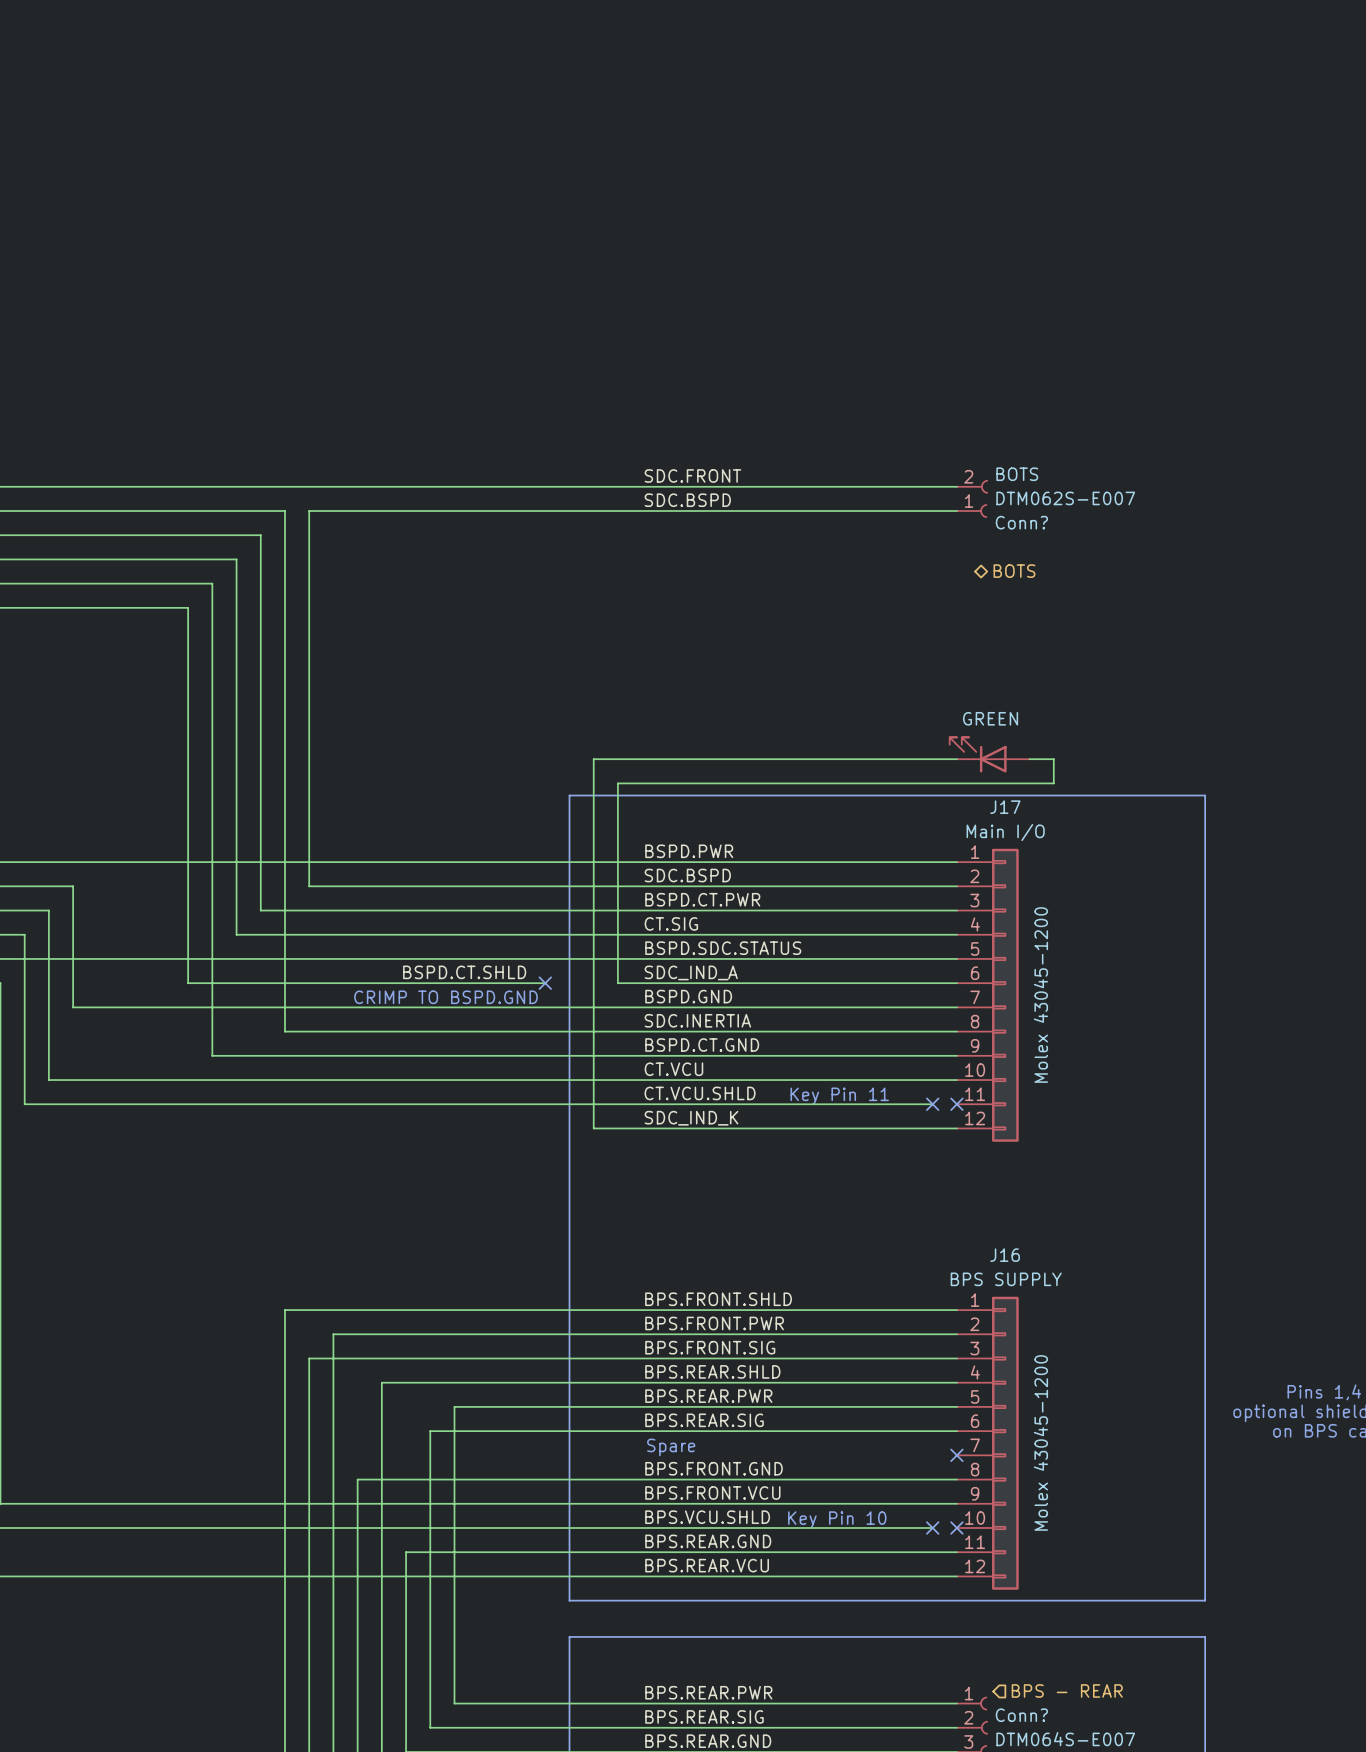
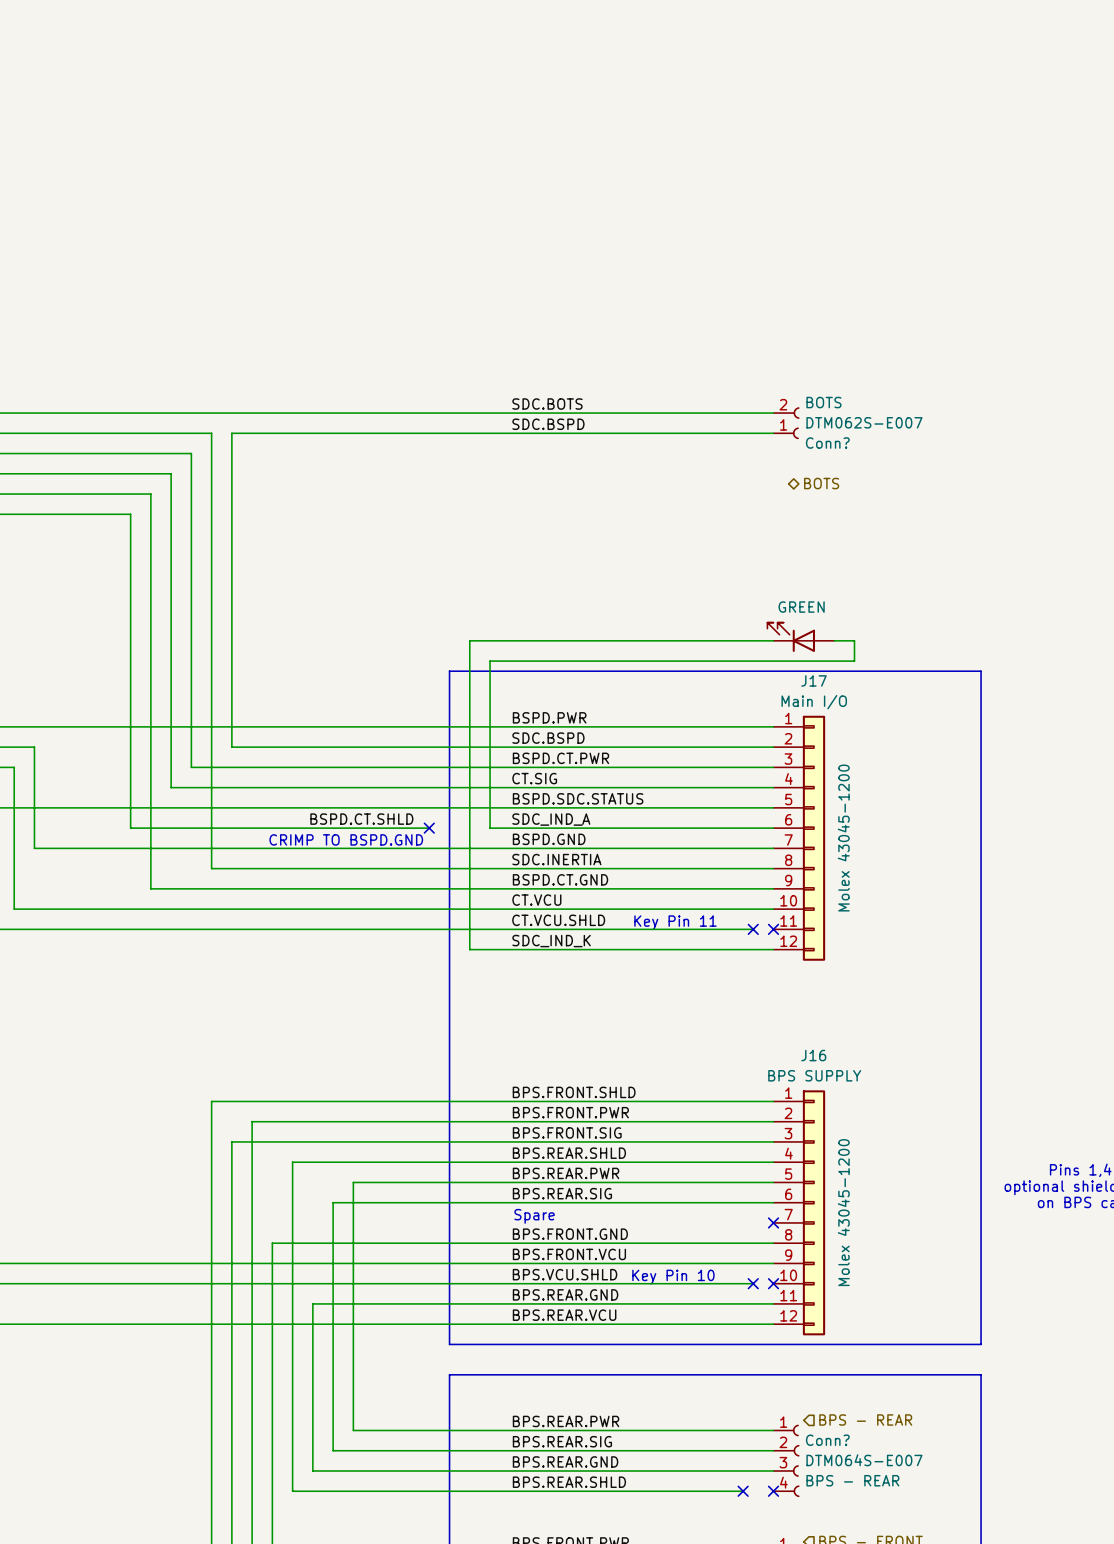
label: SDC.FRONT (692, 475) -> SDC.BOTS (547, 404)

